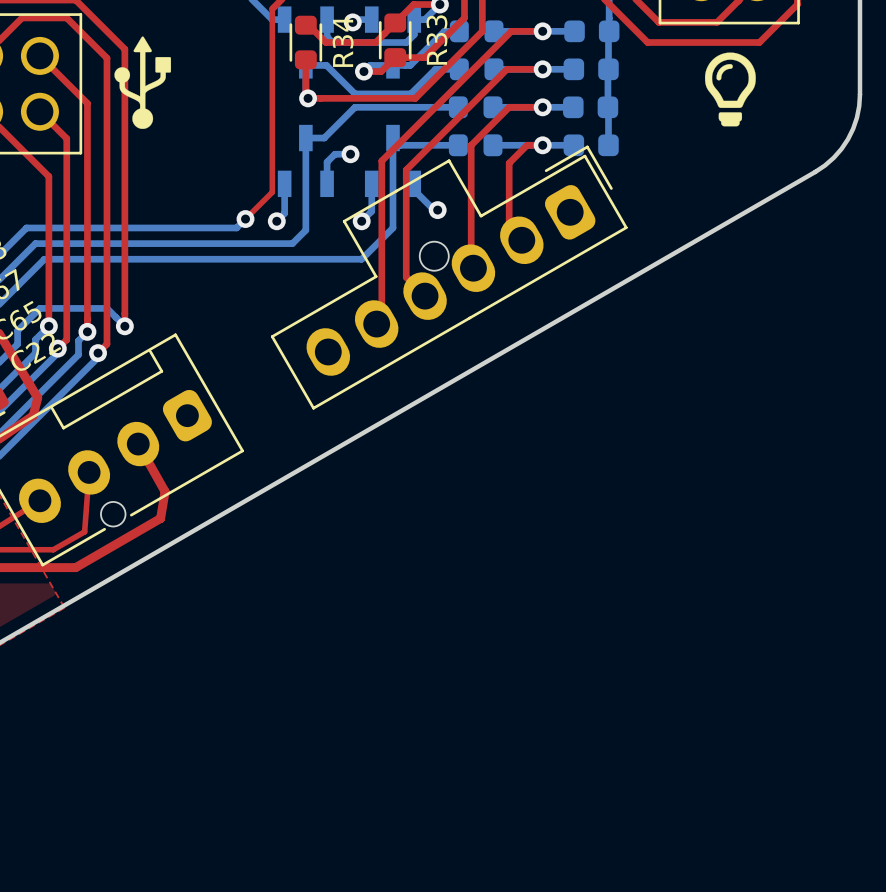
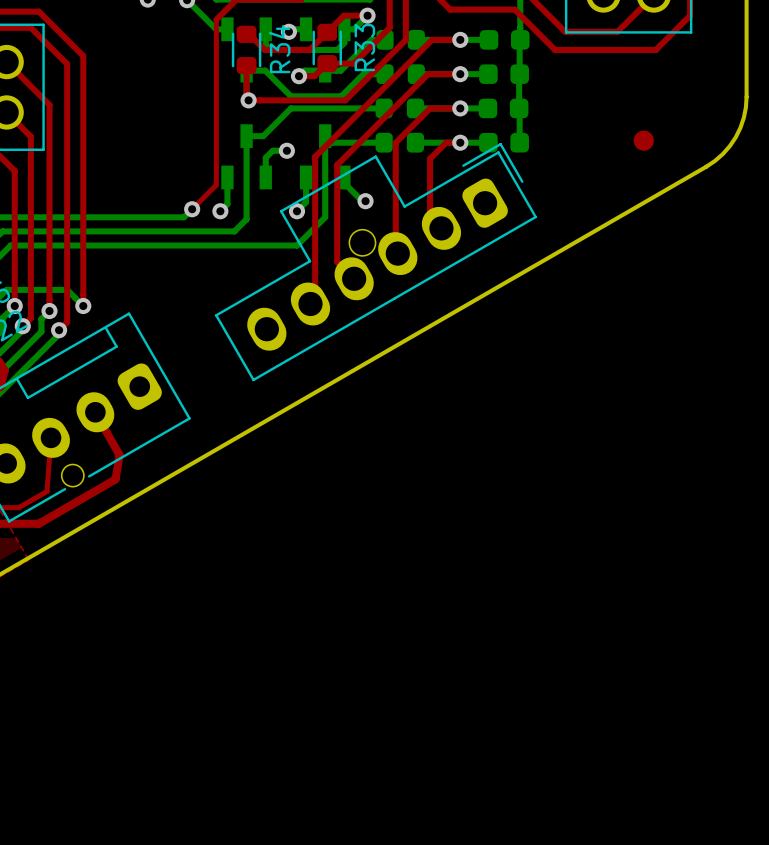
drawing: [114, 36, 172, 129] -> none
drawing: [705, 52, 756, 127] -> none
part: none -> (643, 140)

